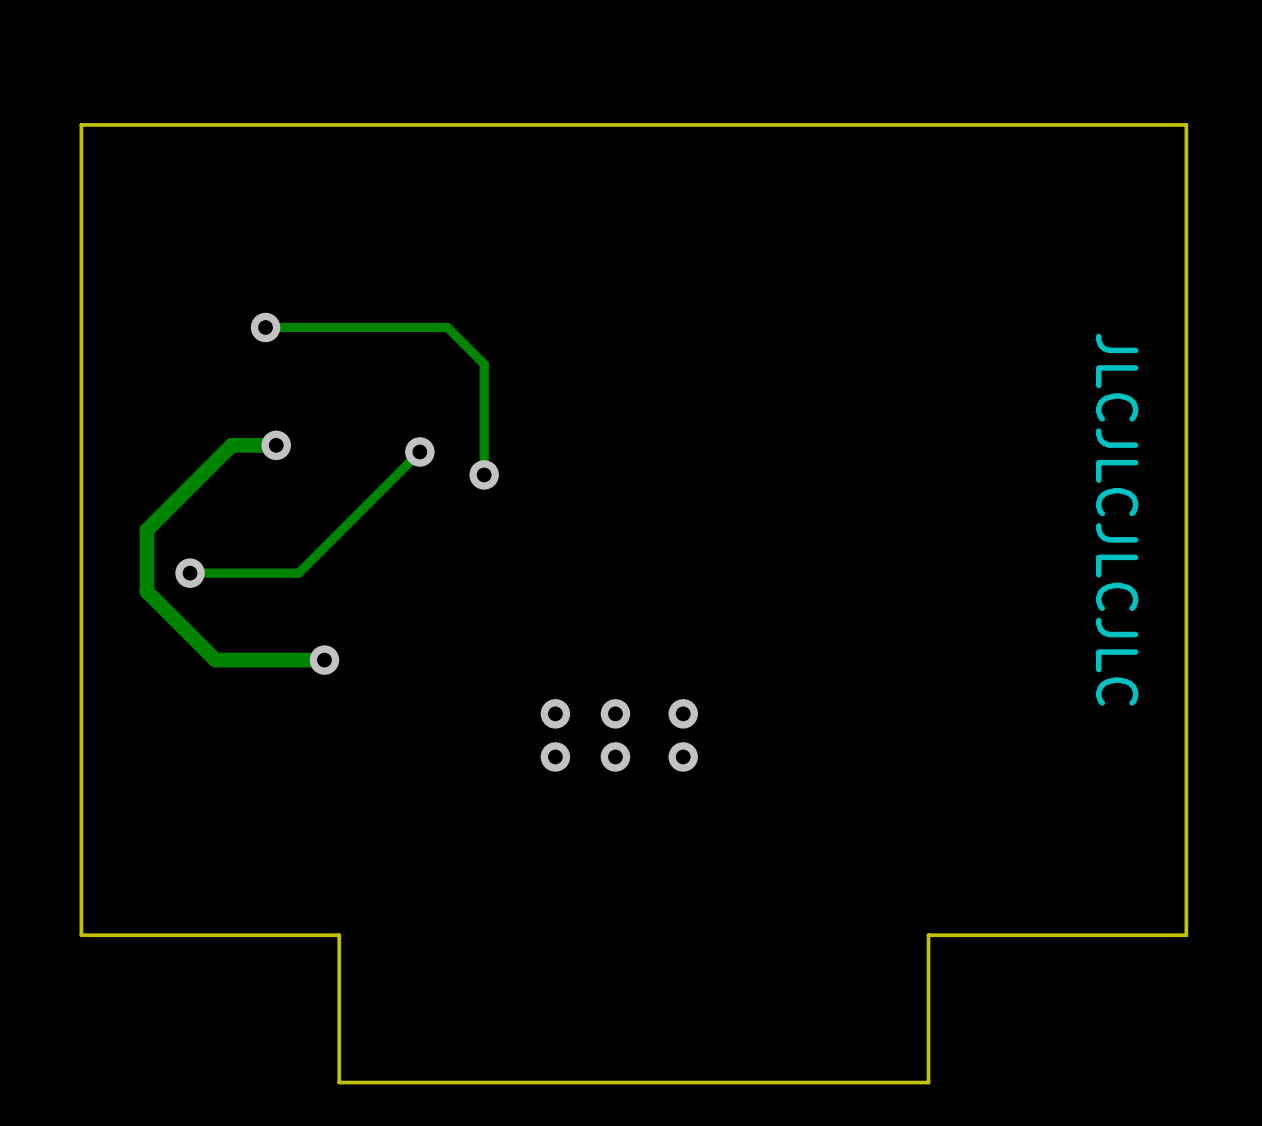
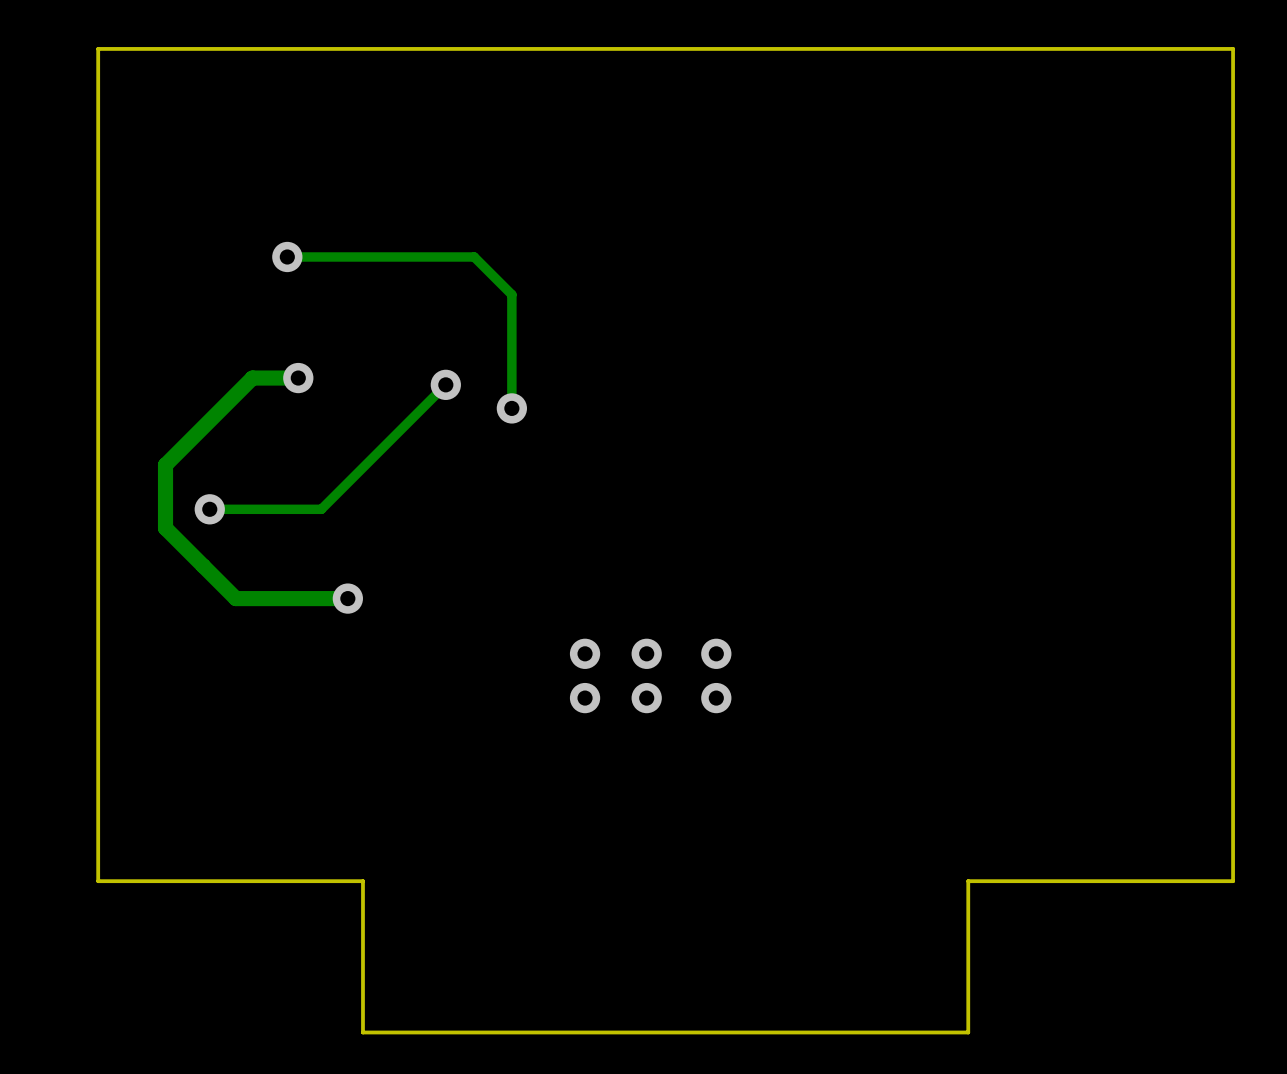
text: JLCJLCJLCJLC (1117, 519) -> none

